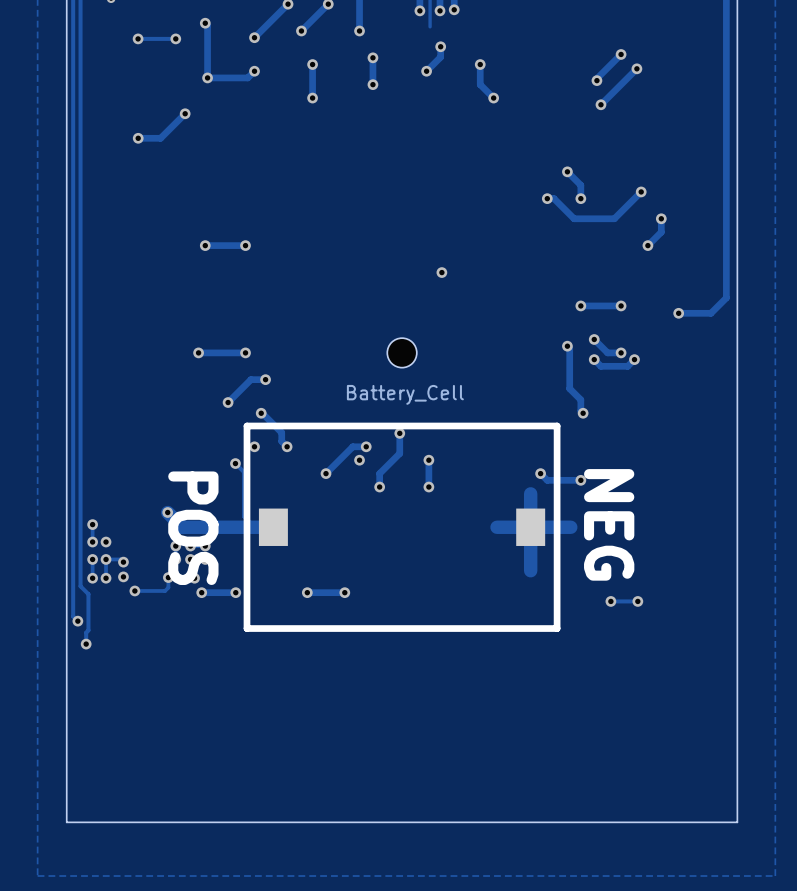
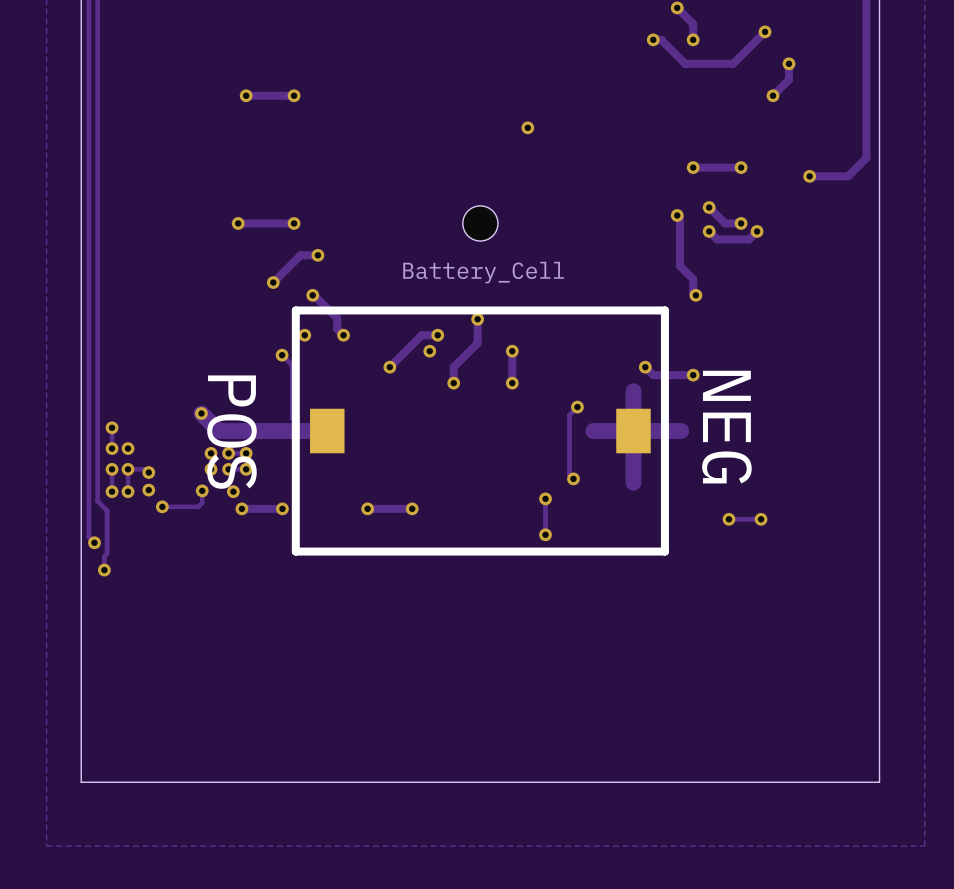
track: none -> (577, 407) (569, 415) (569, 474) (573, 478)
via: none -> (577, 407)
via: none -> (573, 478)
track: none -> (545, 498) (545, 534)
via: none -> (545, 498)
via: none -> (545, 534)

